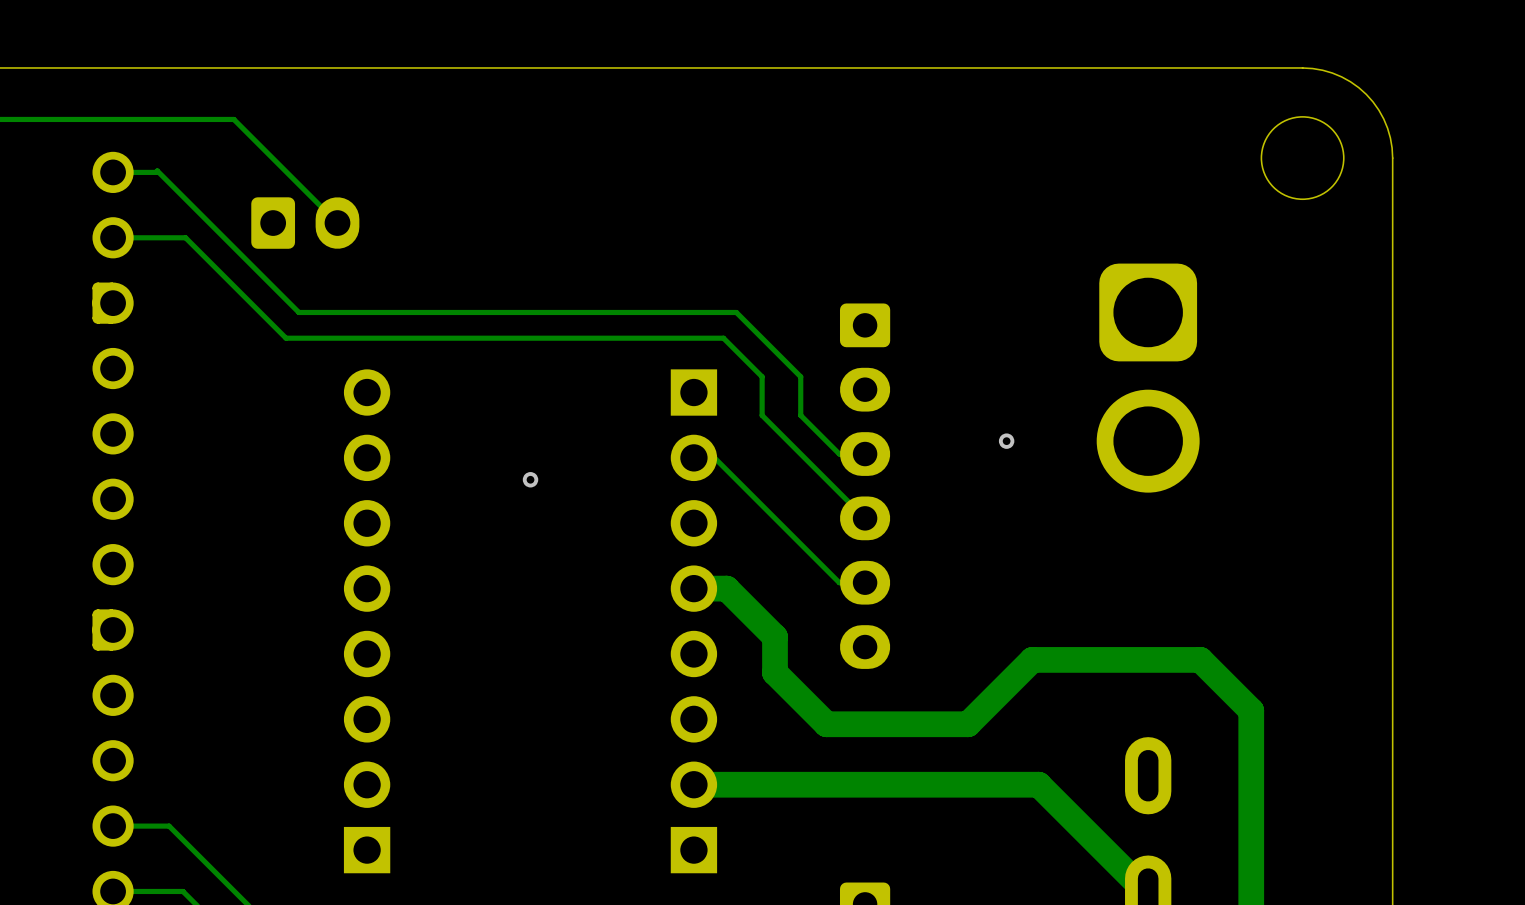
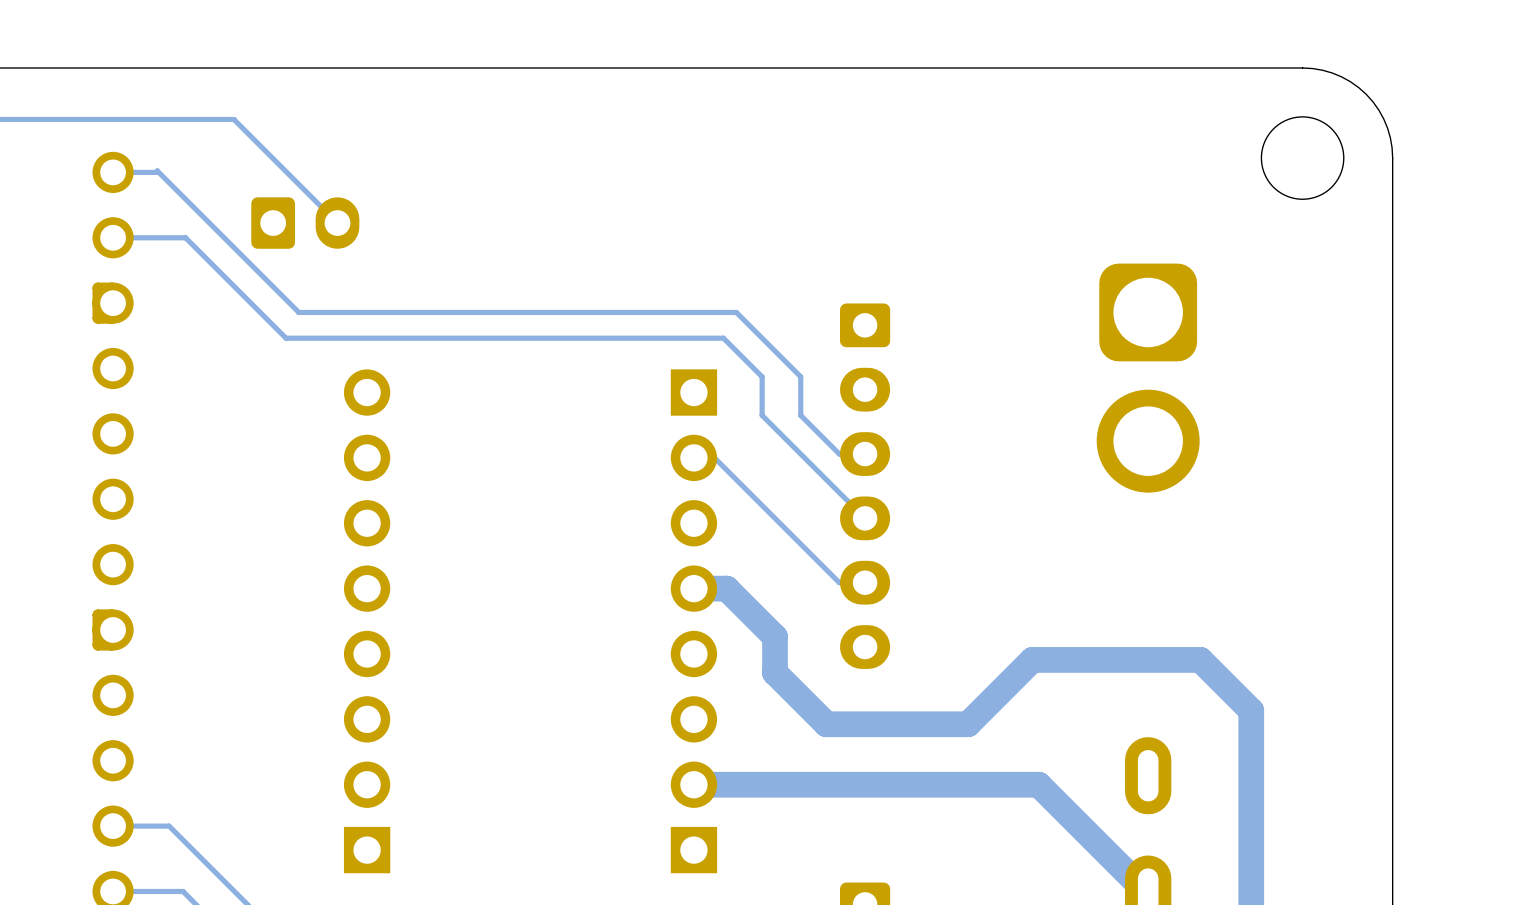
via: (1006, 441) -> none
via: (530, 479) -> none

